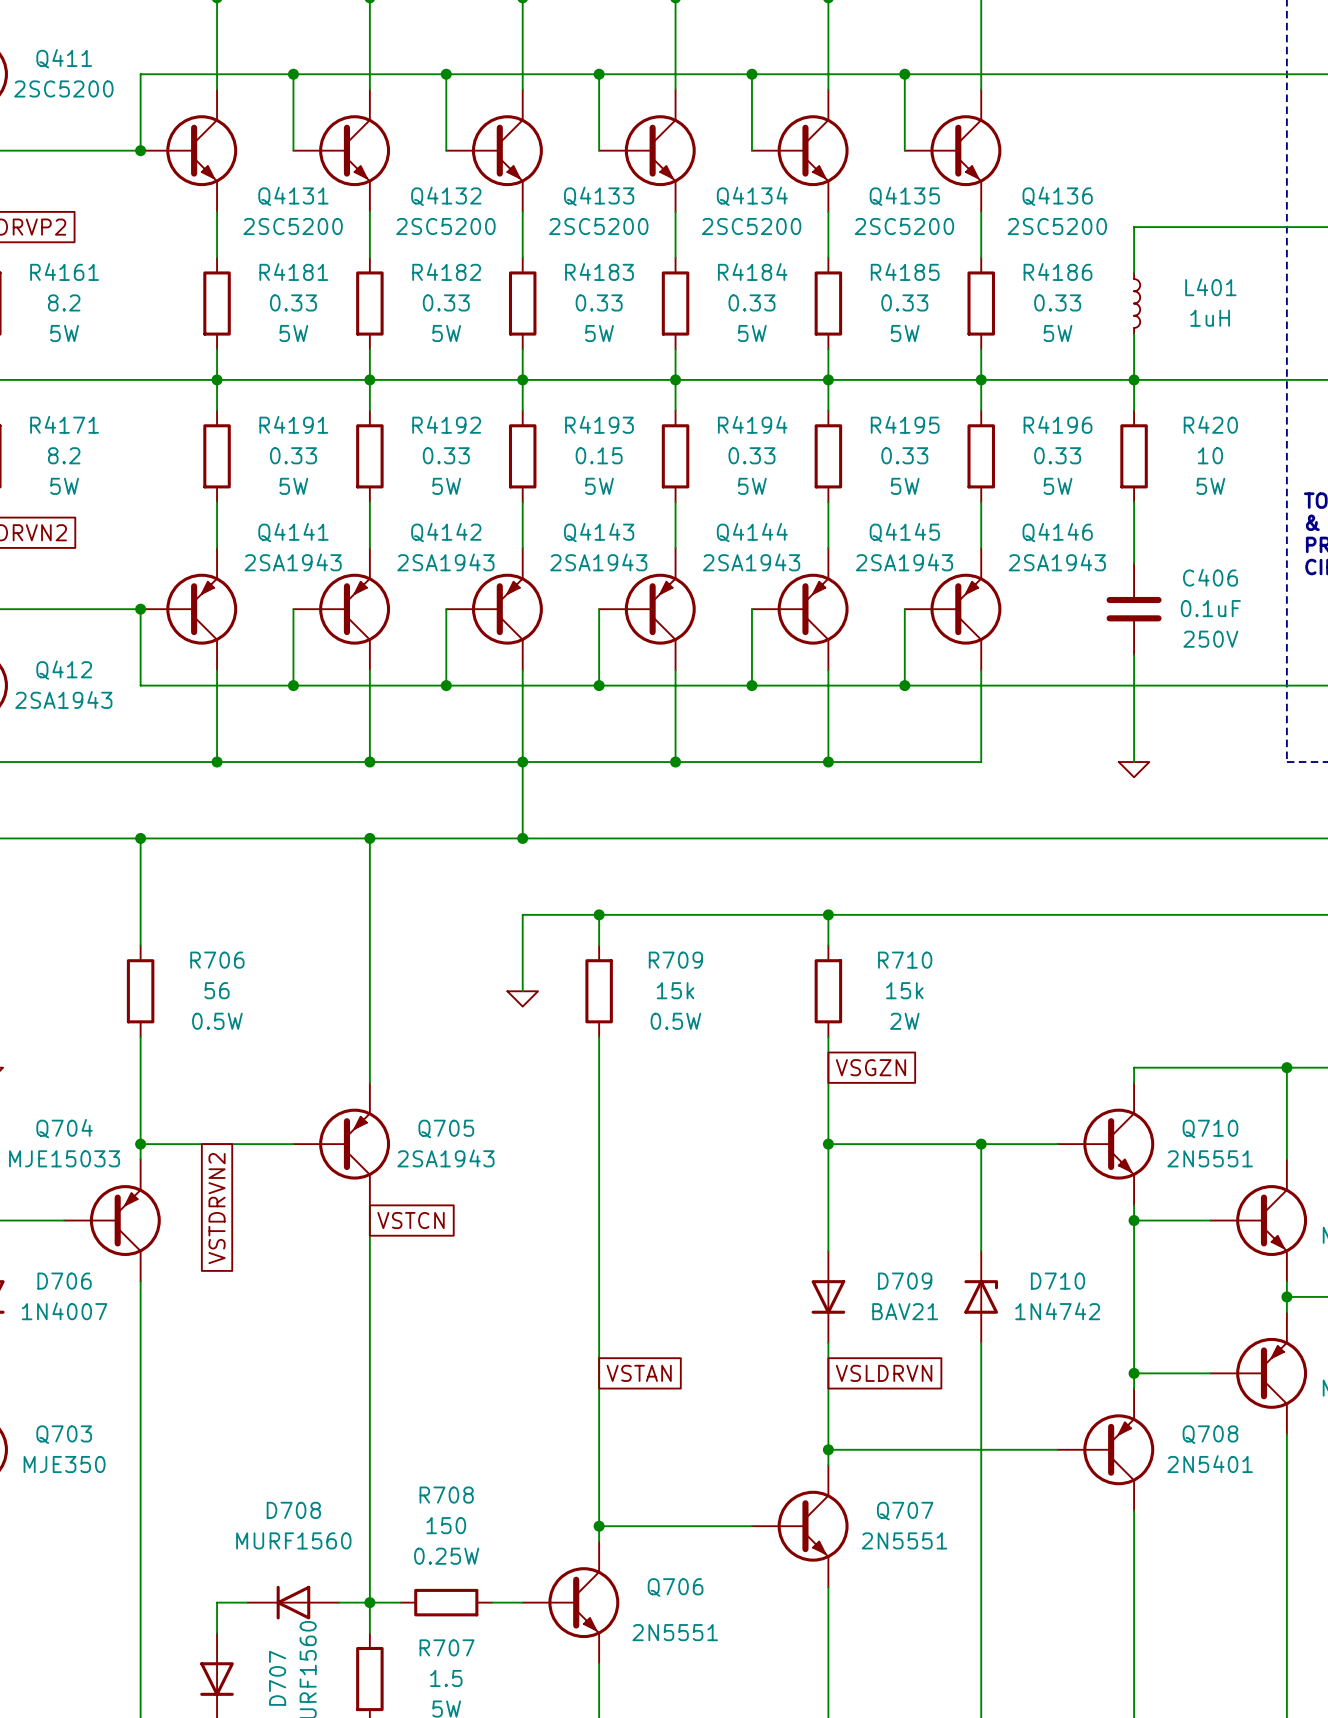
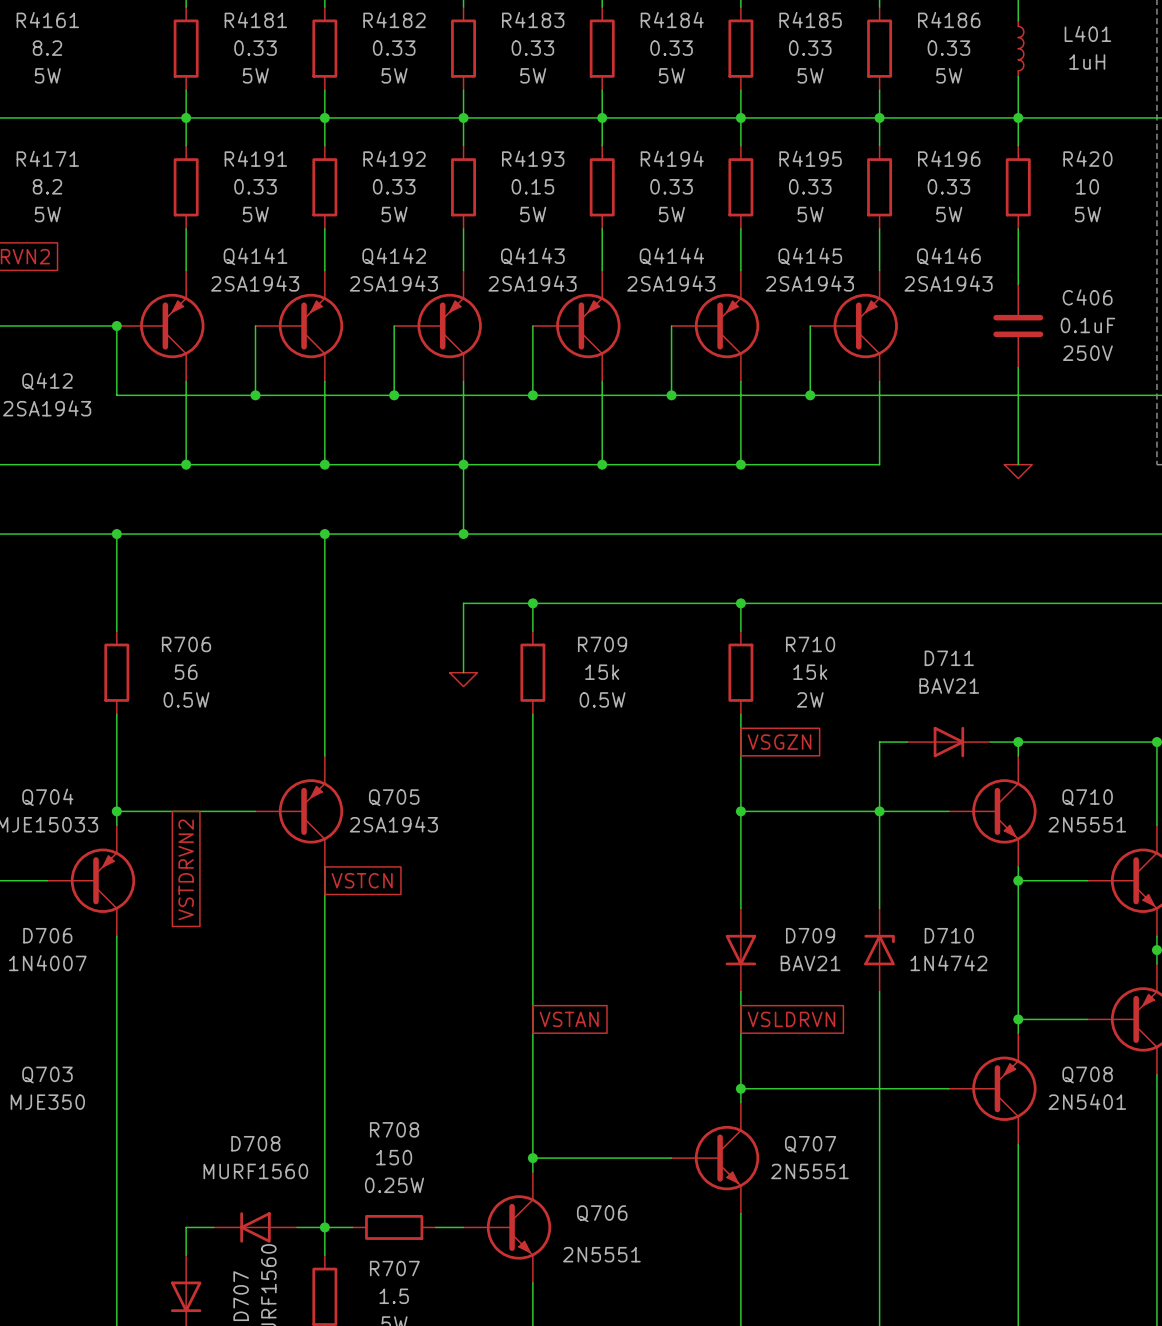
wire: none -> (907, 742) (879, 742) (879, 811)
D711: none -> BAV21 (948, 742)
wire: none -> (990, 742) (1018, 742)
junction: none -> (1018, 742)

